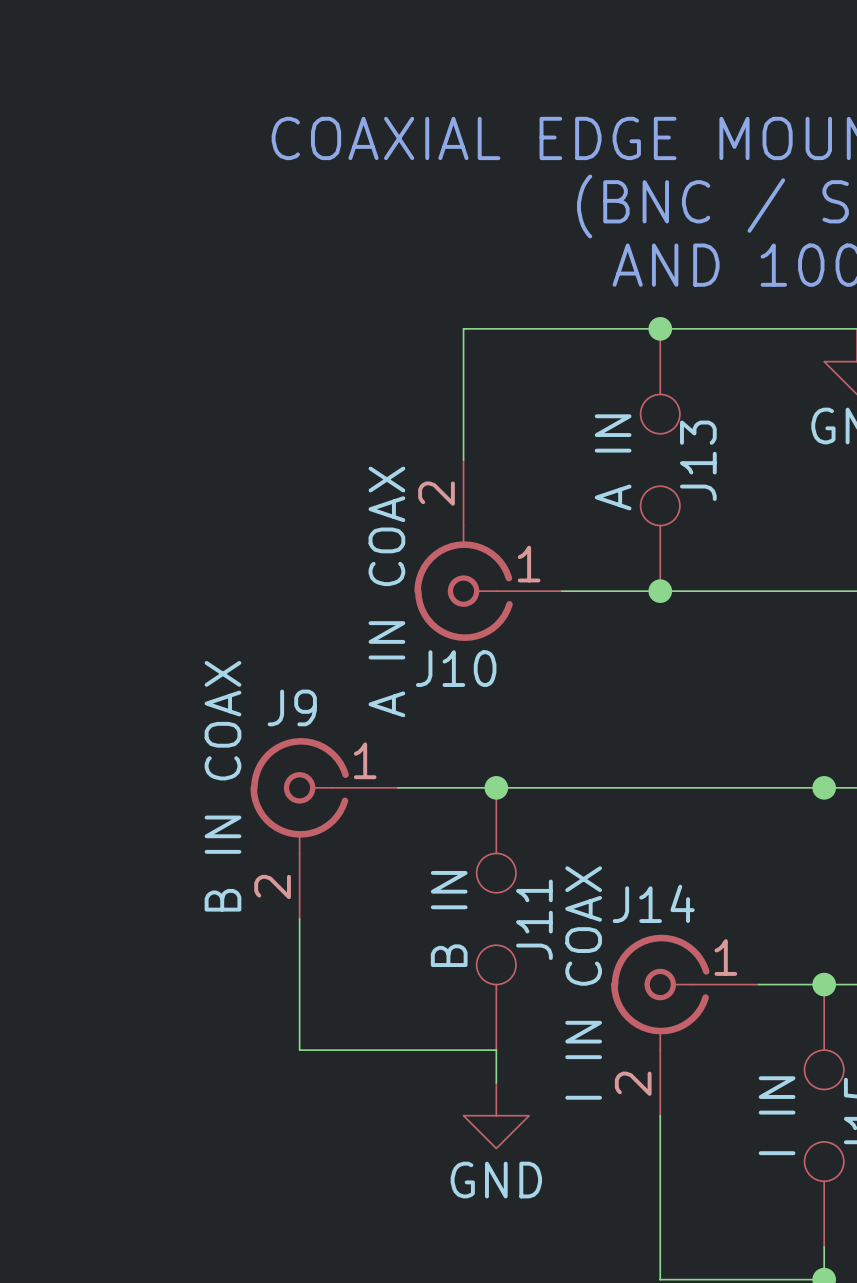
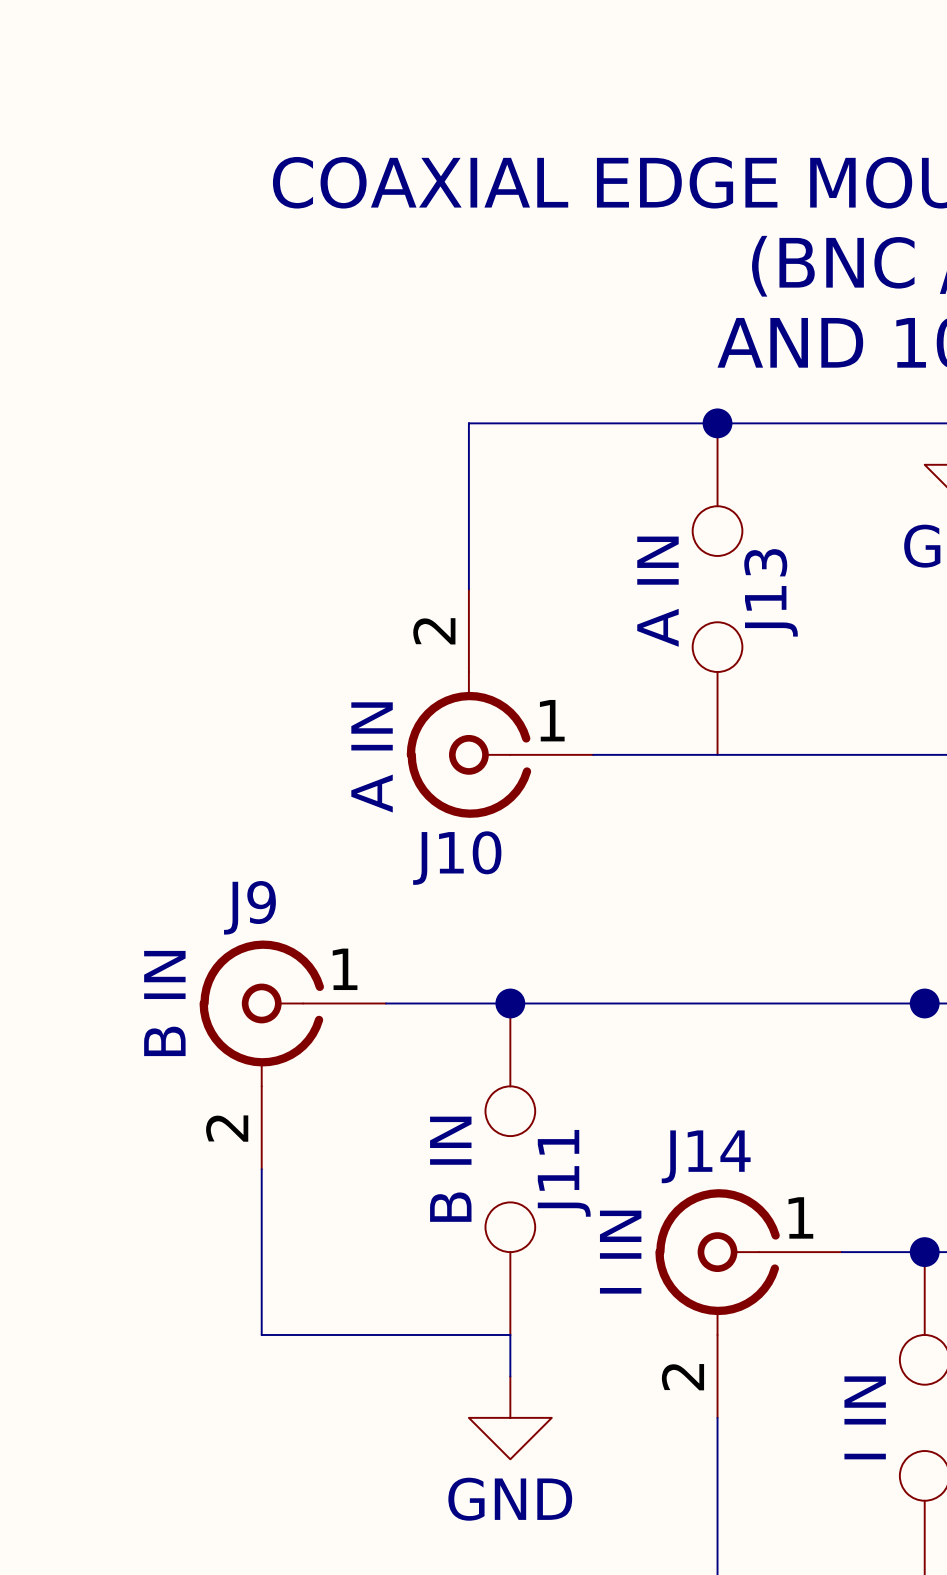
J10 value: A IN COAX (386, 591) -> A IN (372, 757)
junction: (660, 591) -> none
J9 value: B IN COAX (222, 786) -> B IN (164, 1003)
J14 value: I IN COAX (583, 983) -> I IN (620, 1252)

